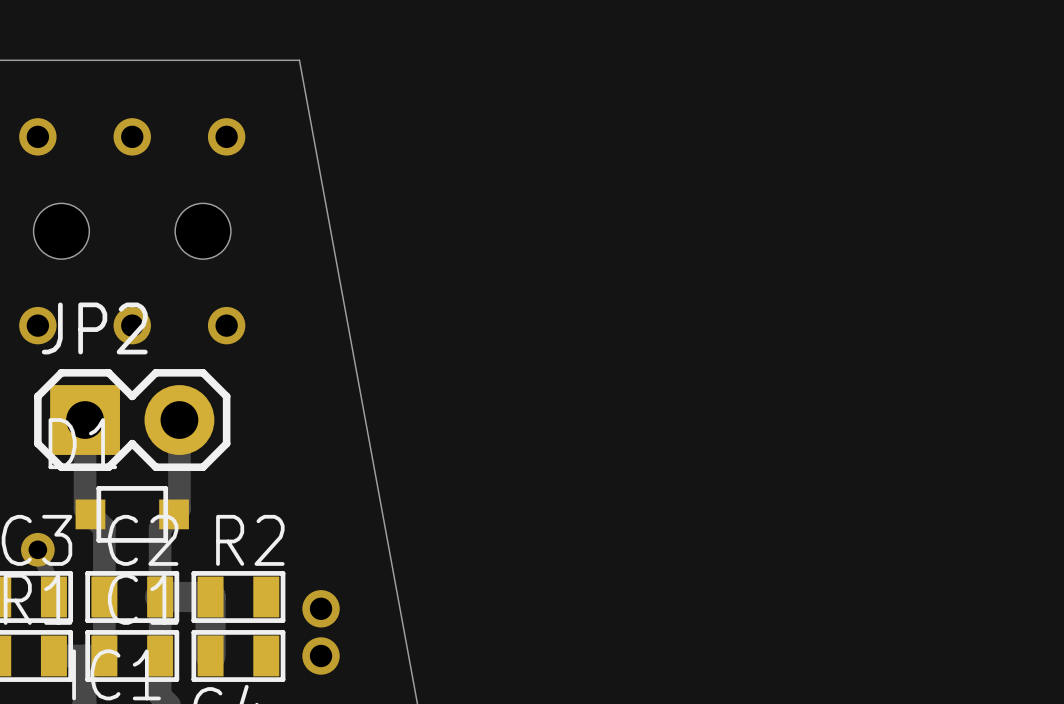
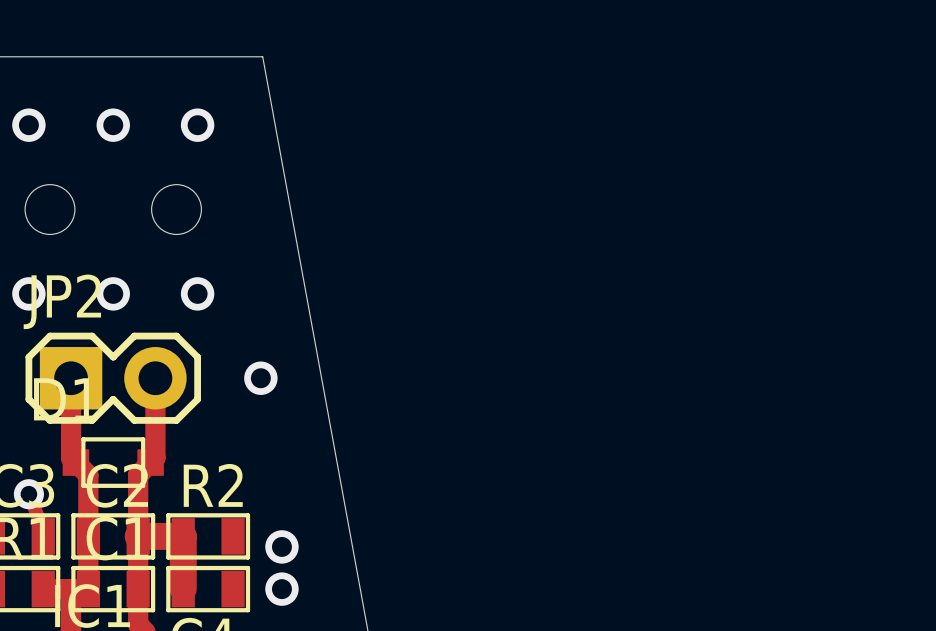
via: none -> (260, 378)

